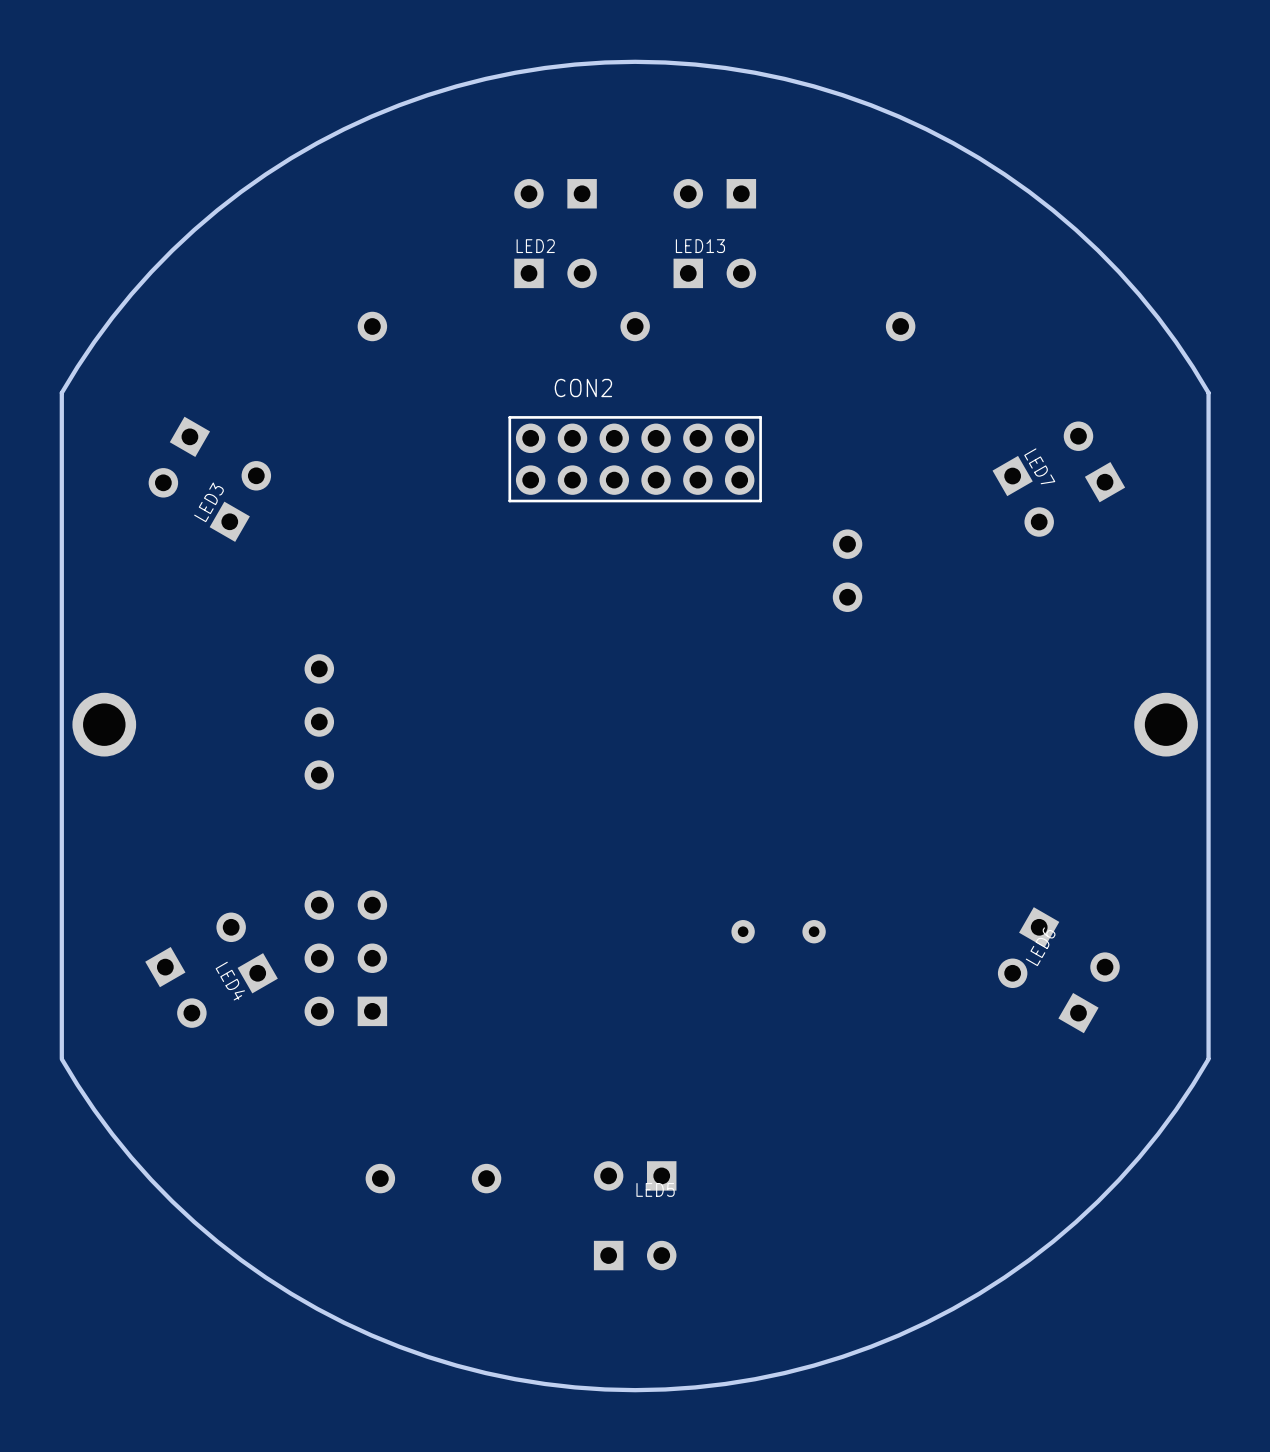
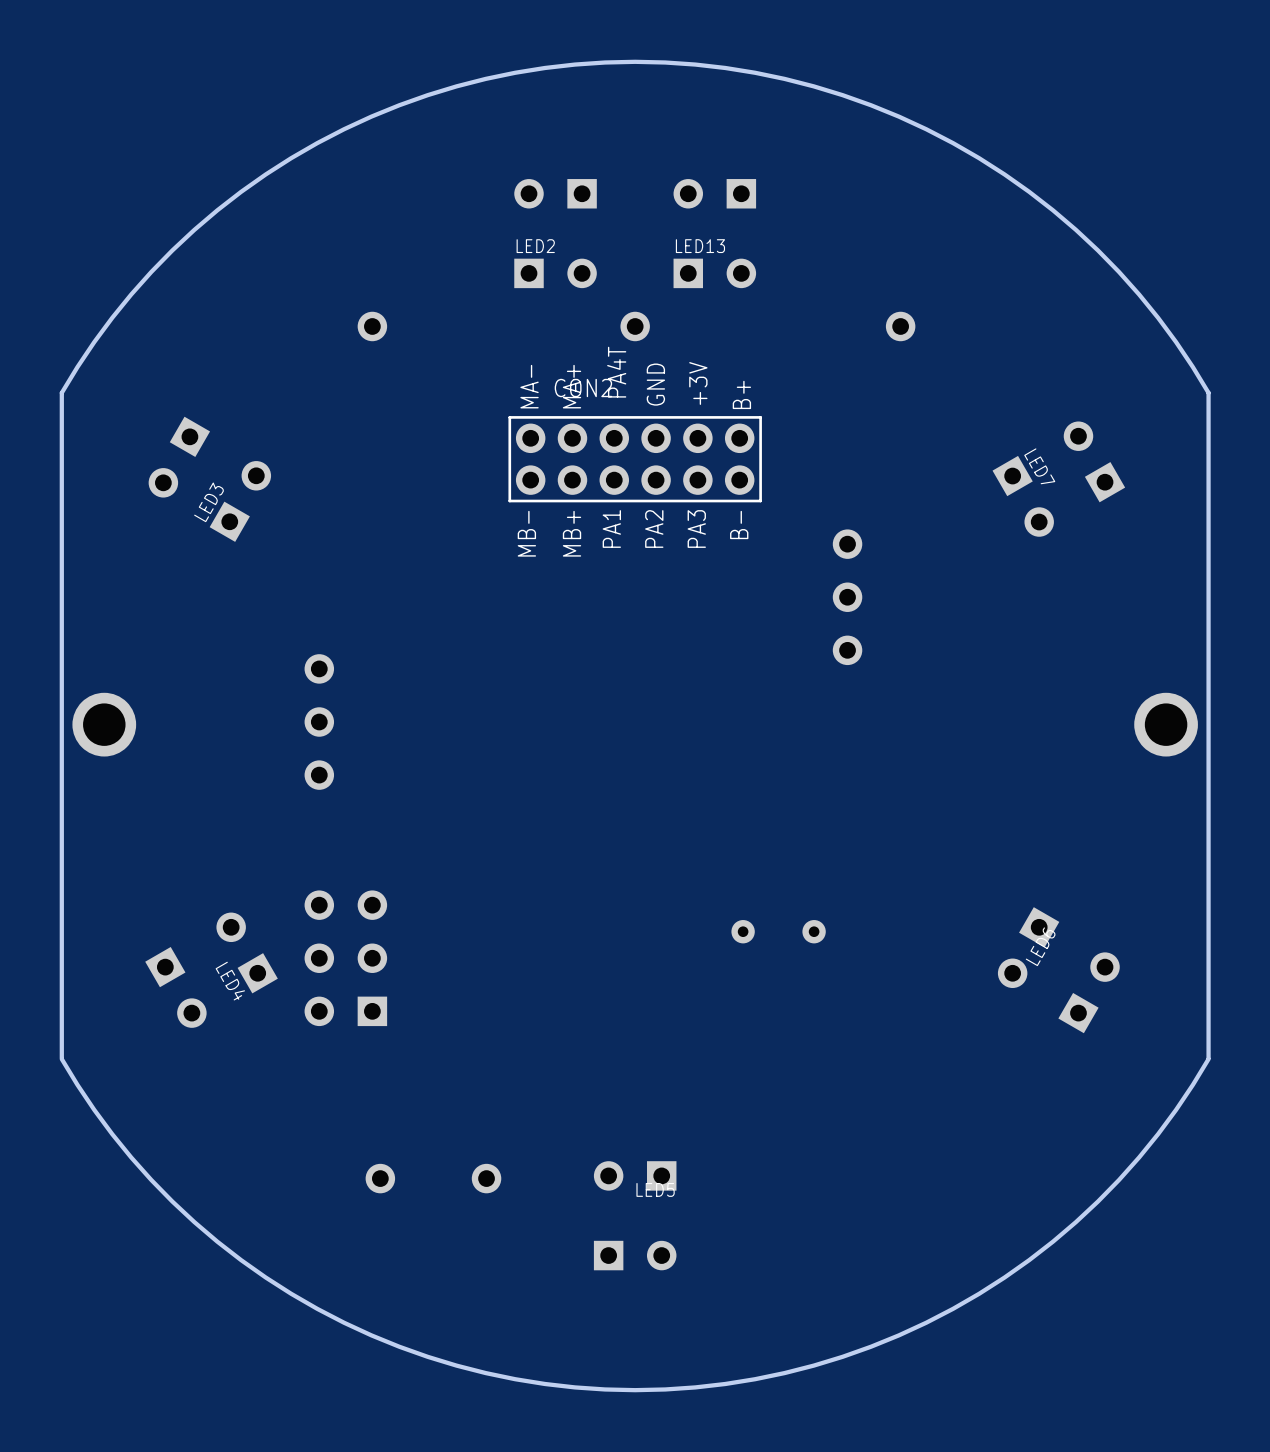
text: none -> PA4T (616, 372)
text: none -> +3V (698, 383)
text: none -> GND (655, 384)
text: none -> MA- (529, 386)
text: none -> MA+ (572, 386)
text: none -> B+ (741, 394)
text: none -> B- (739, 524)
text: none -> PA1 (611, 529)
text: none -> PA2 (654, 529)
text: none -> PA3 (696, 529)
text: none -> MB- (526, 533)
text: none -> MB+ (572, 533)
part: none -> (847, 597)

